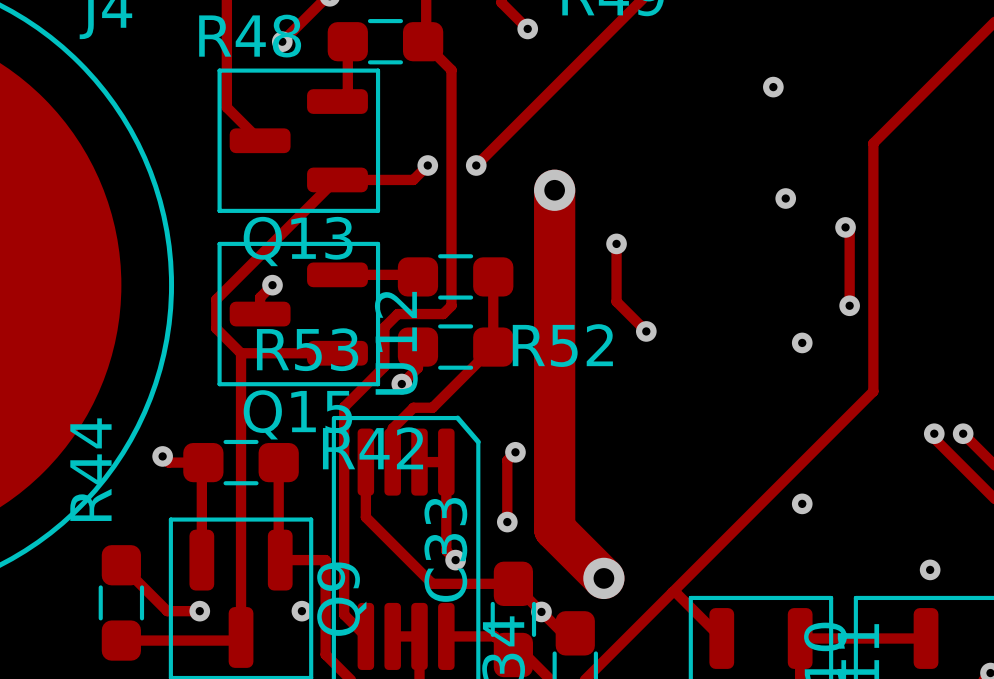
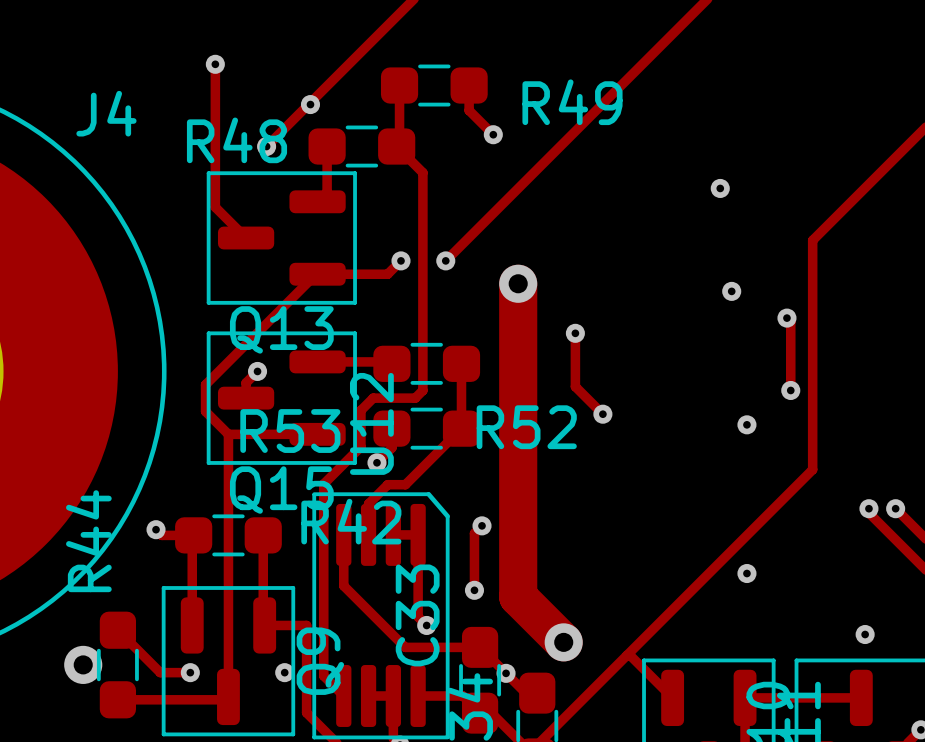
via: none -> (83, 664)

